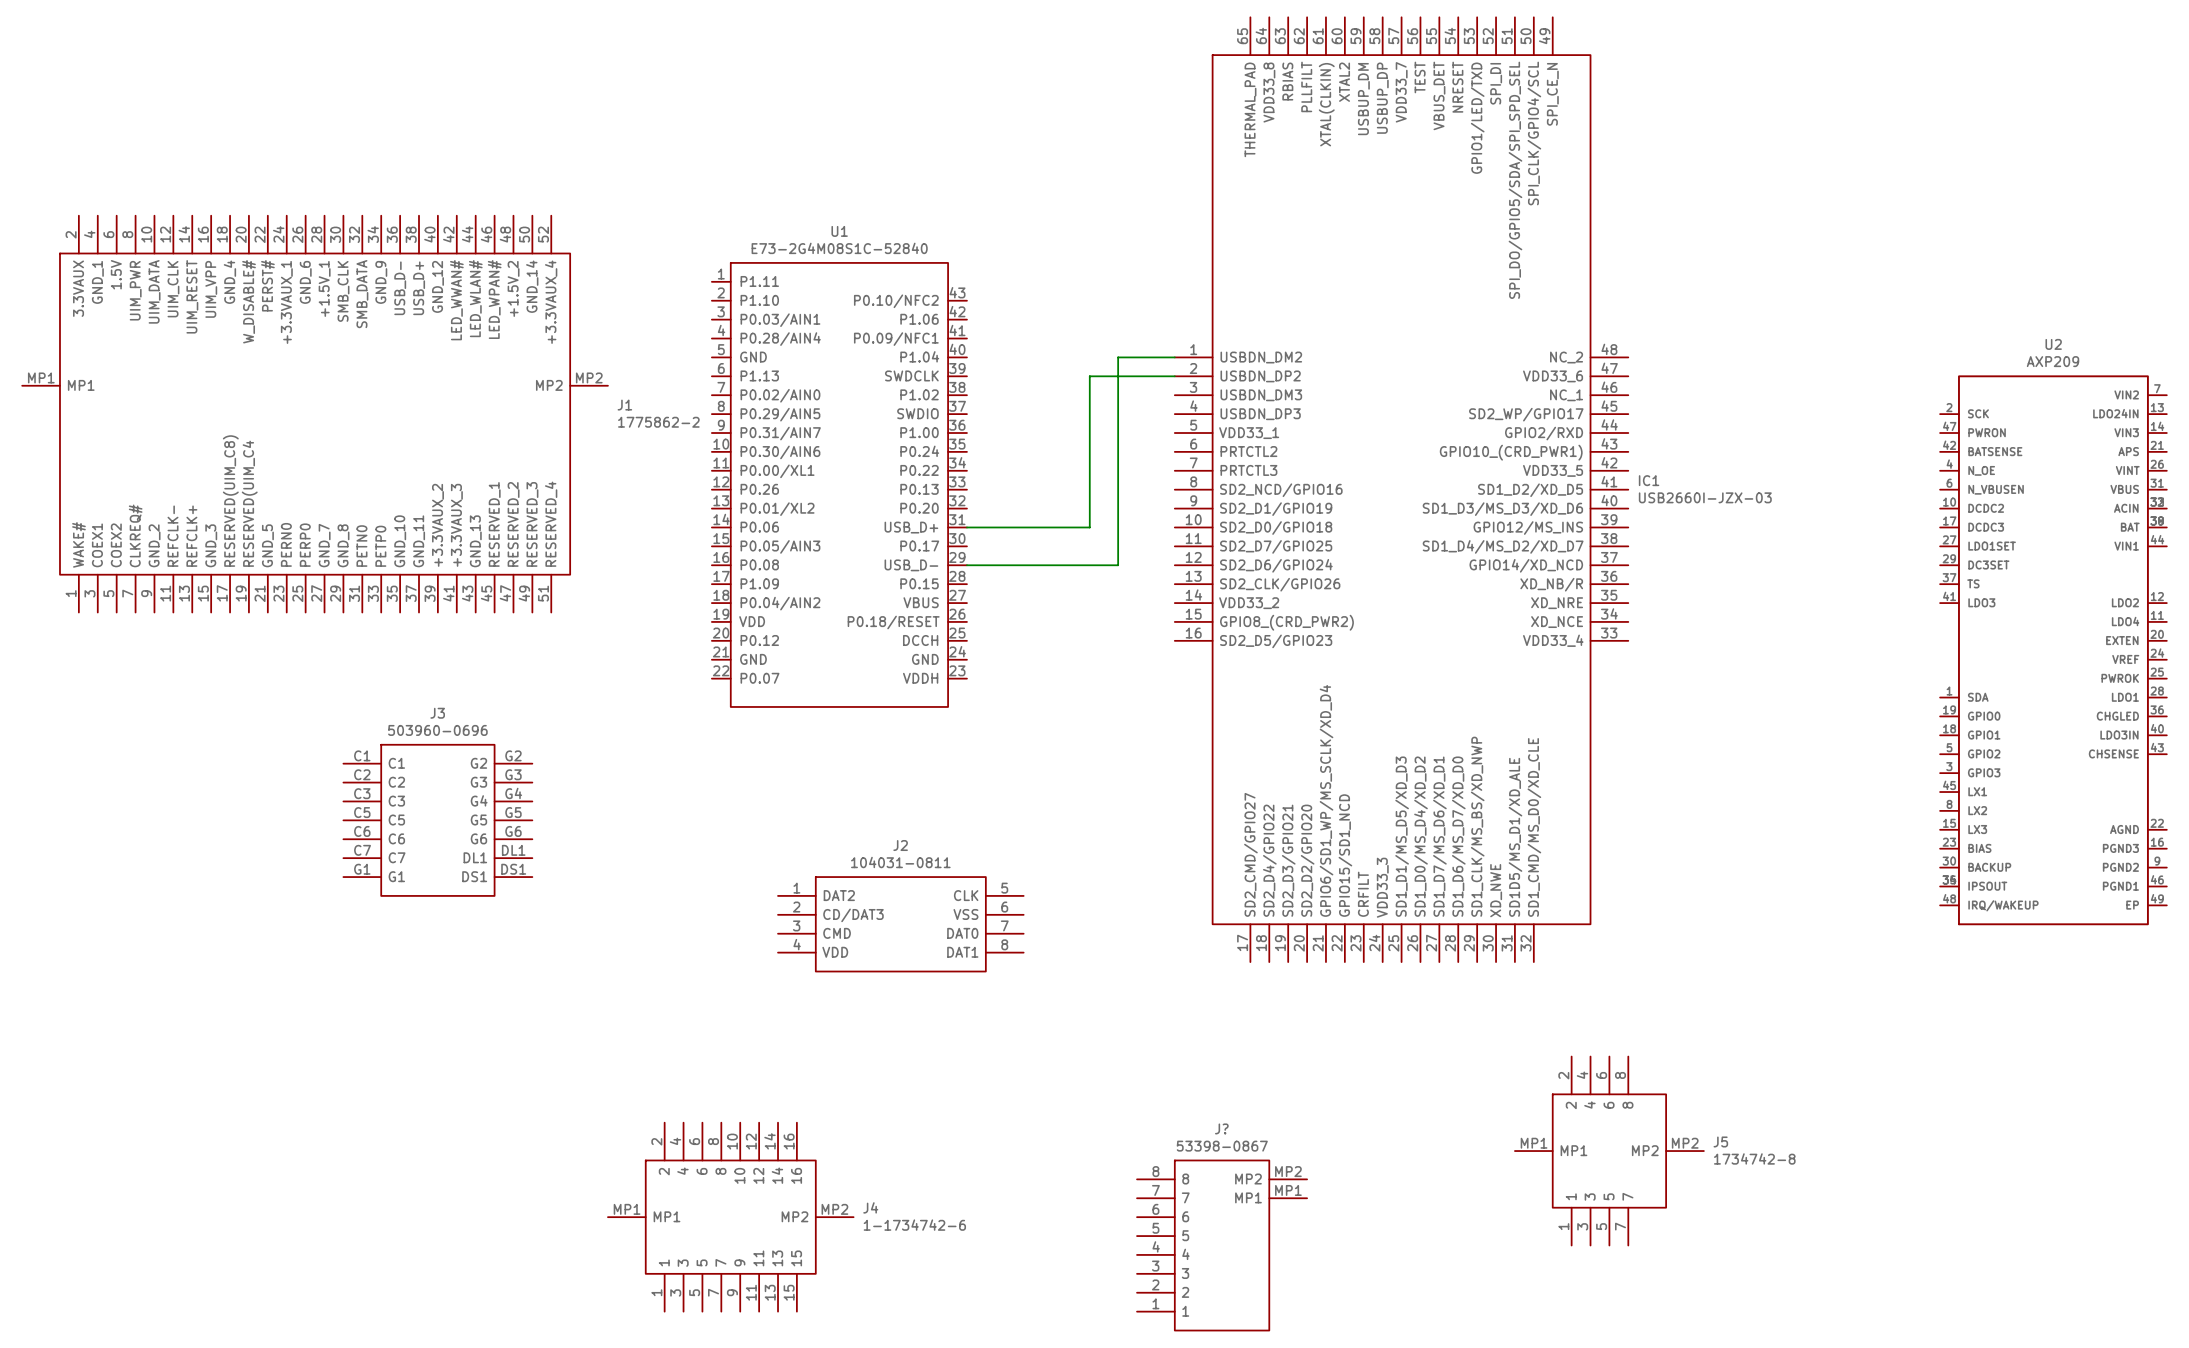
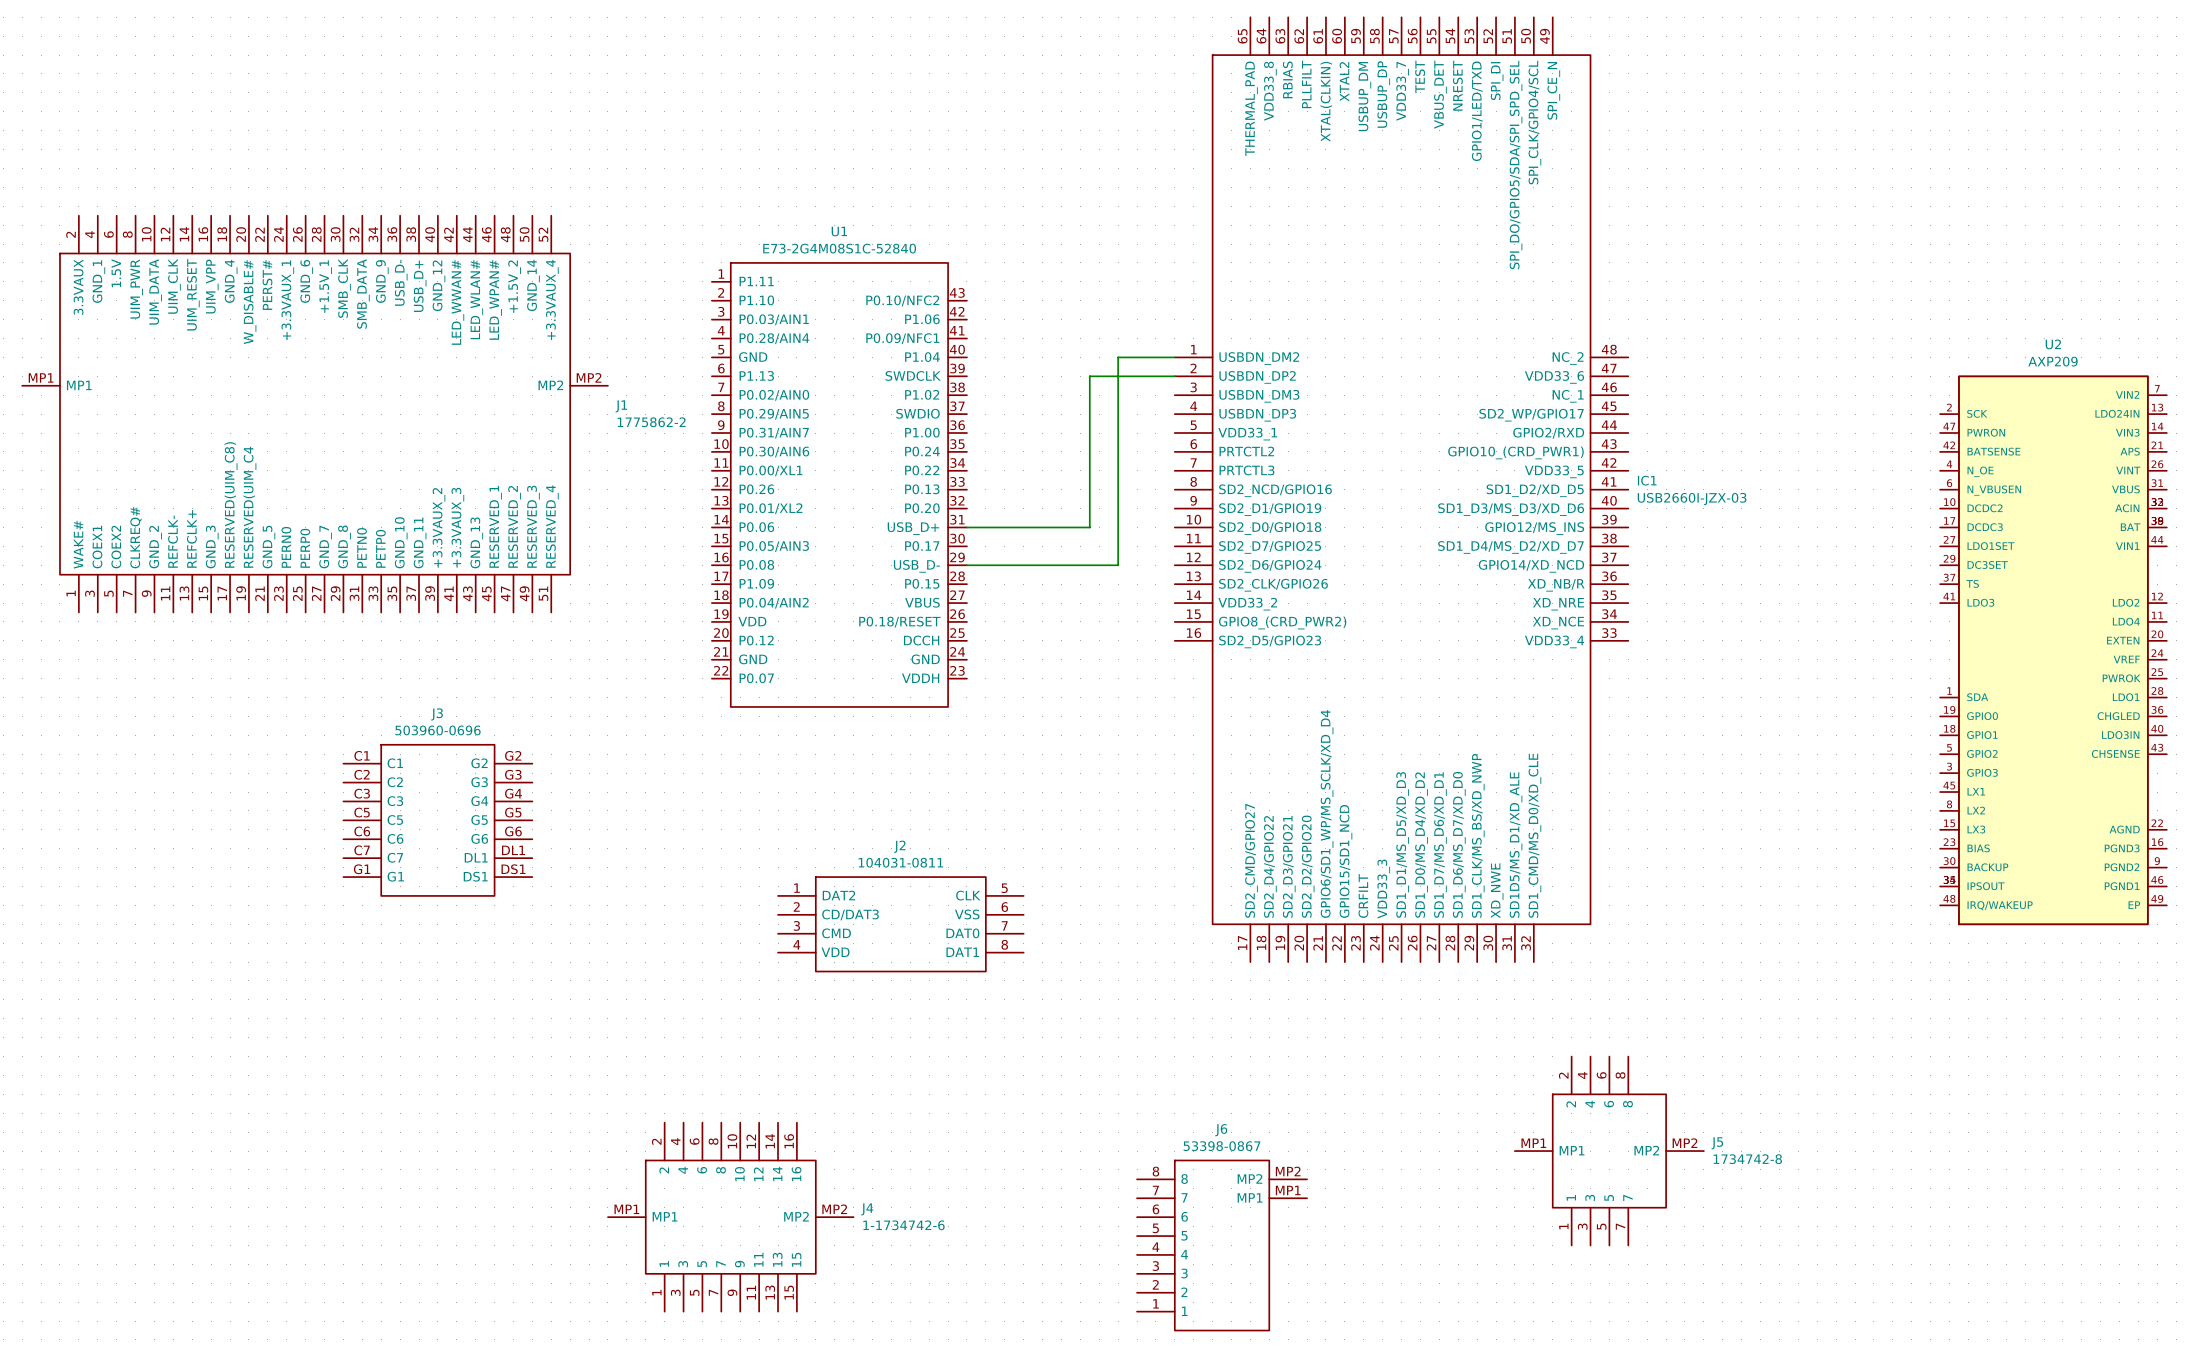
J? name: J? (1221, 1128) -> J6 (1221, 1130)

